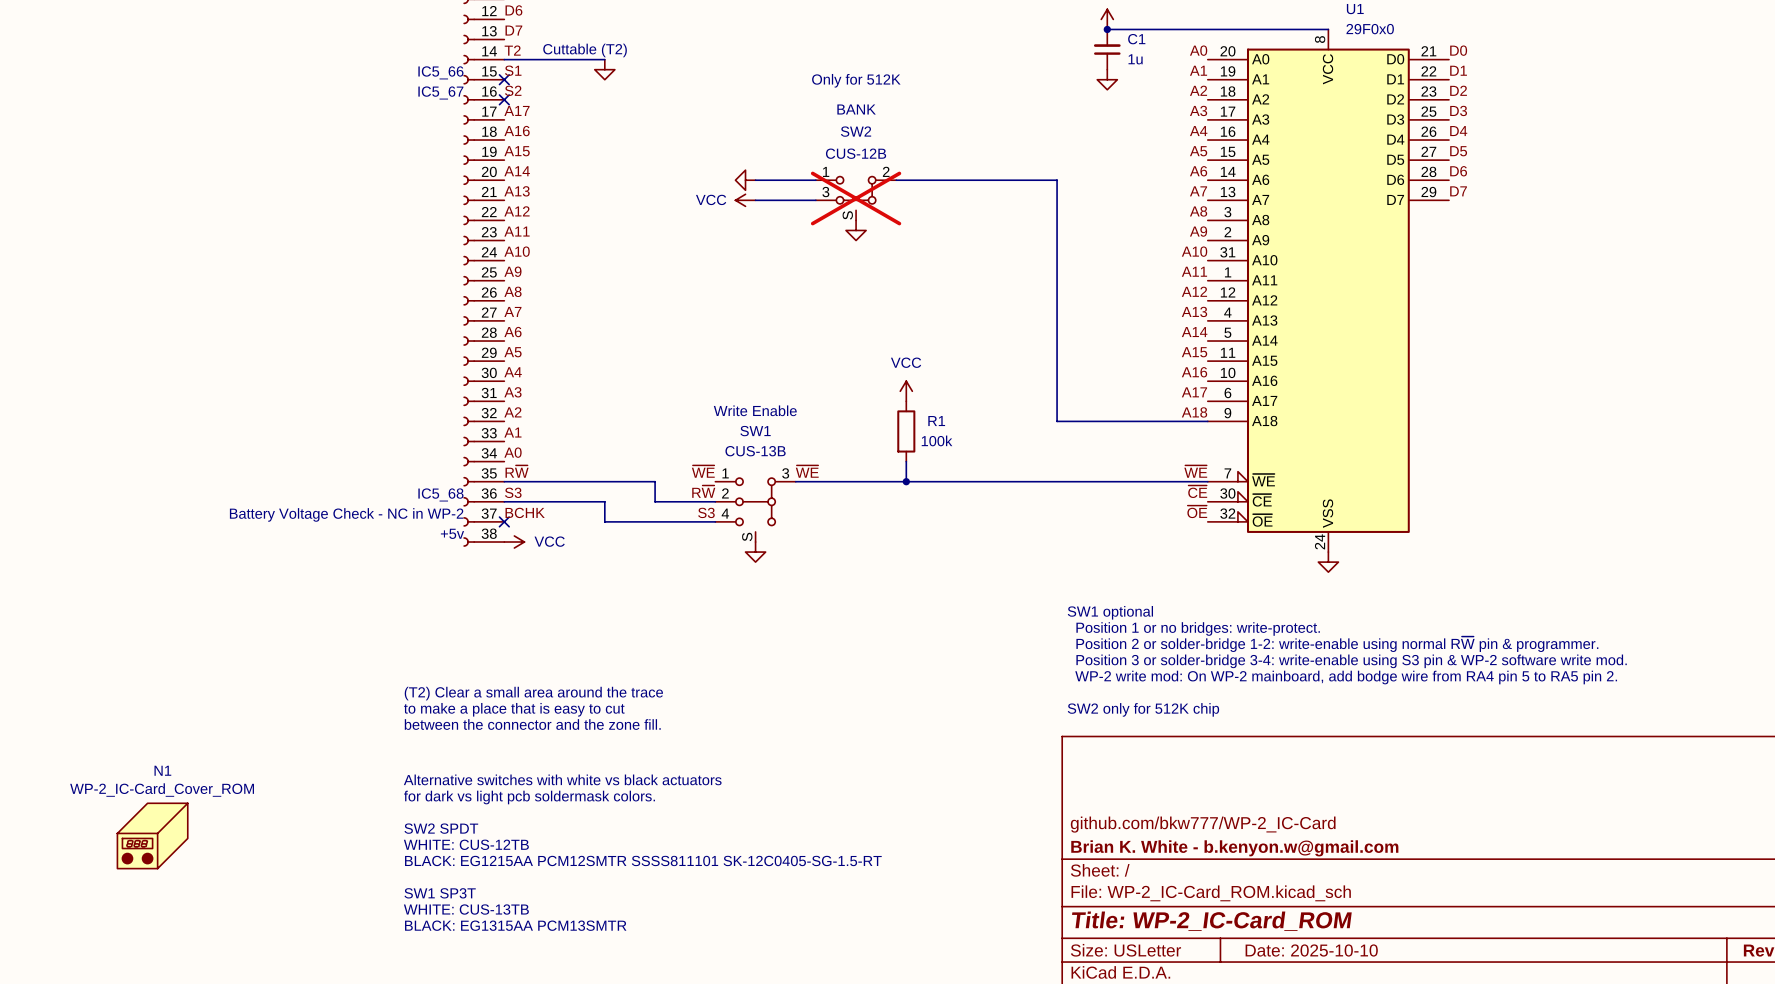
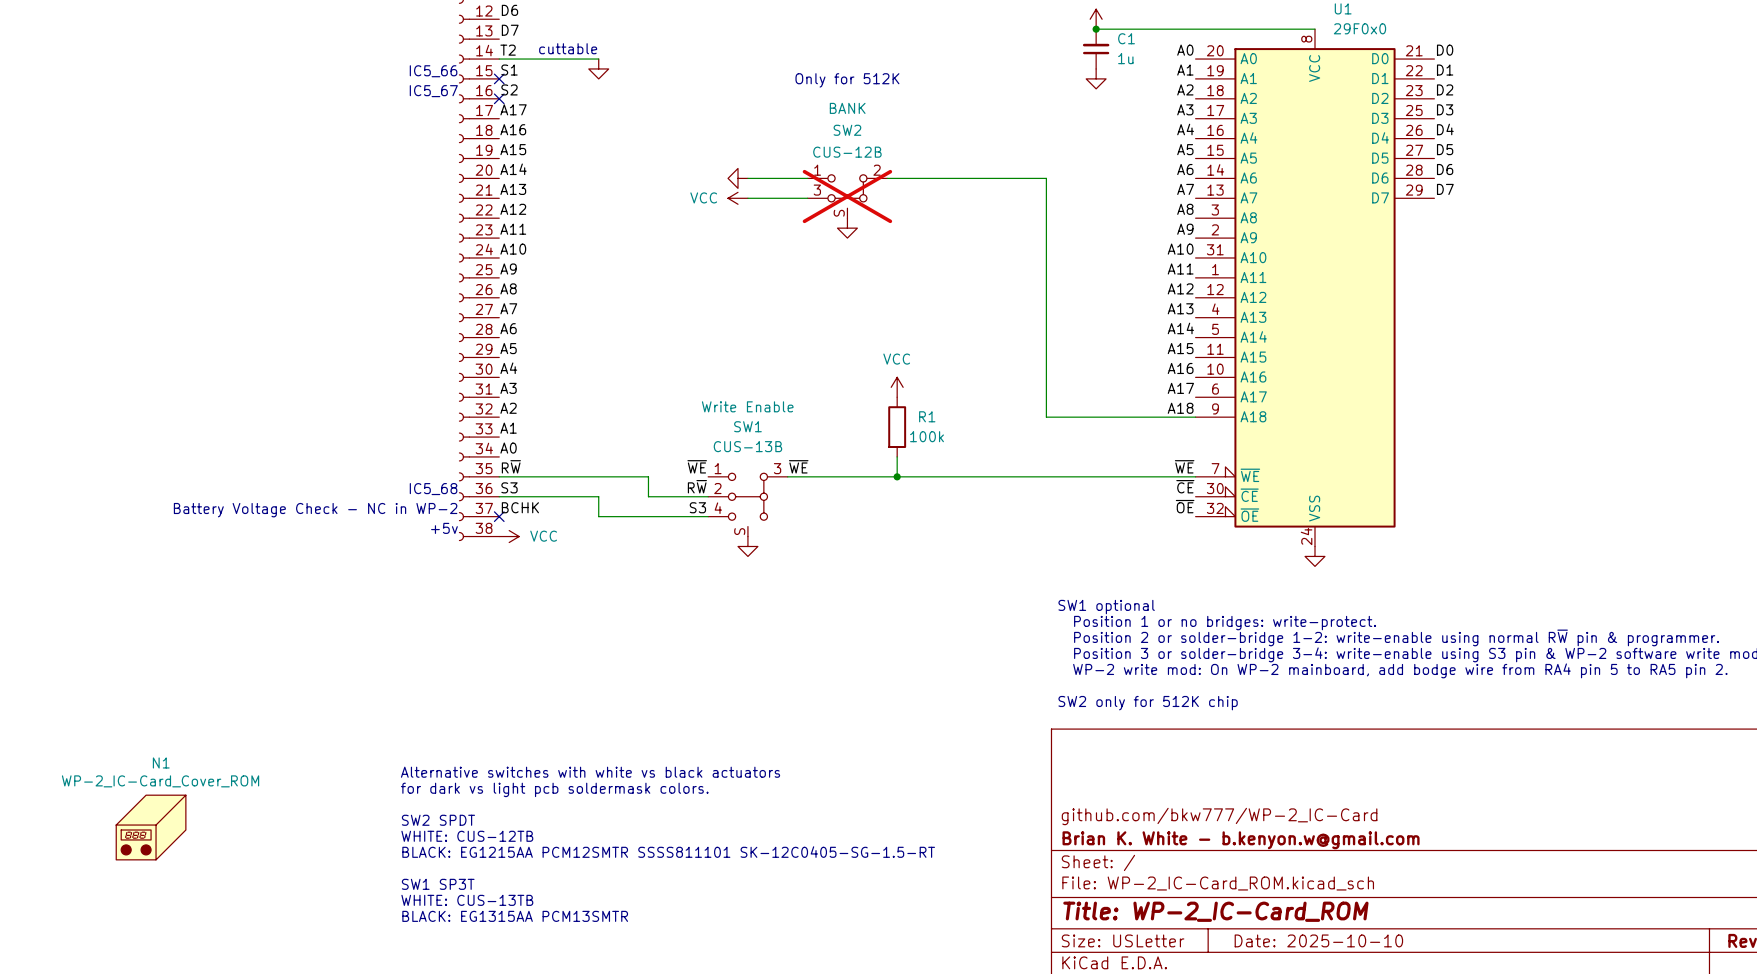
text: Cuttable (T2) (585, 50) -> cuttable (568, 48)
text: (T2) Clear a small area around the trace (533, 693) -> none
text: to make a place that is easy to cut (514, 709) -> none
text: between the connector and the zone fill. (532, 724) -> none

